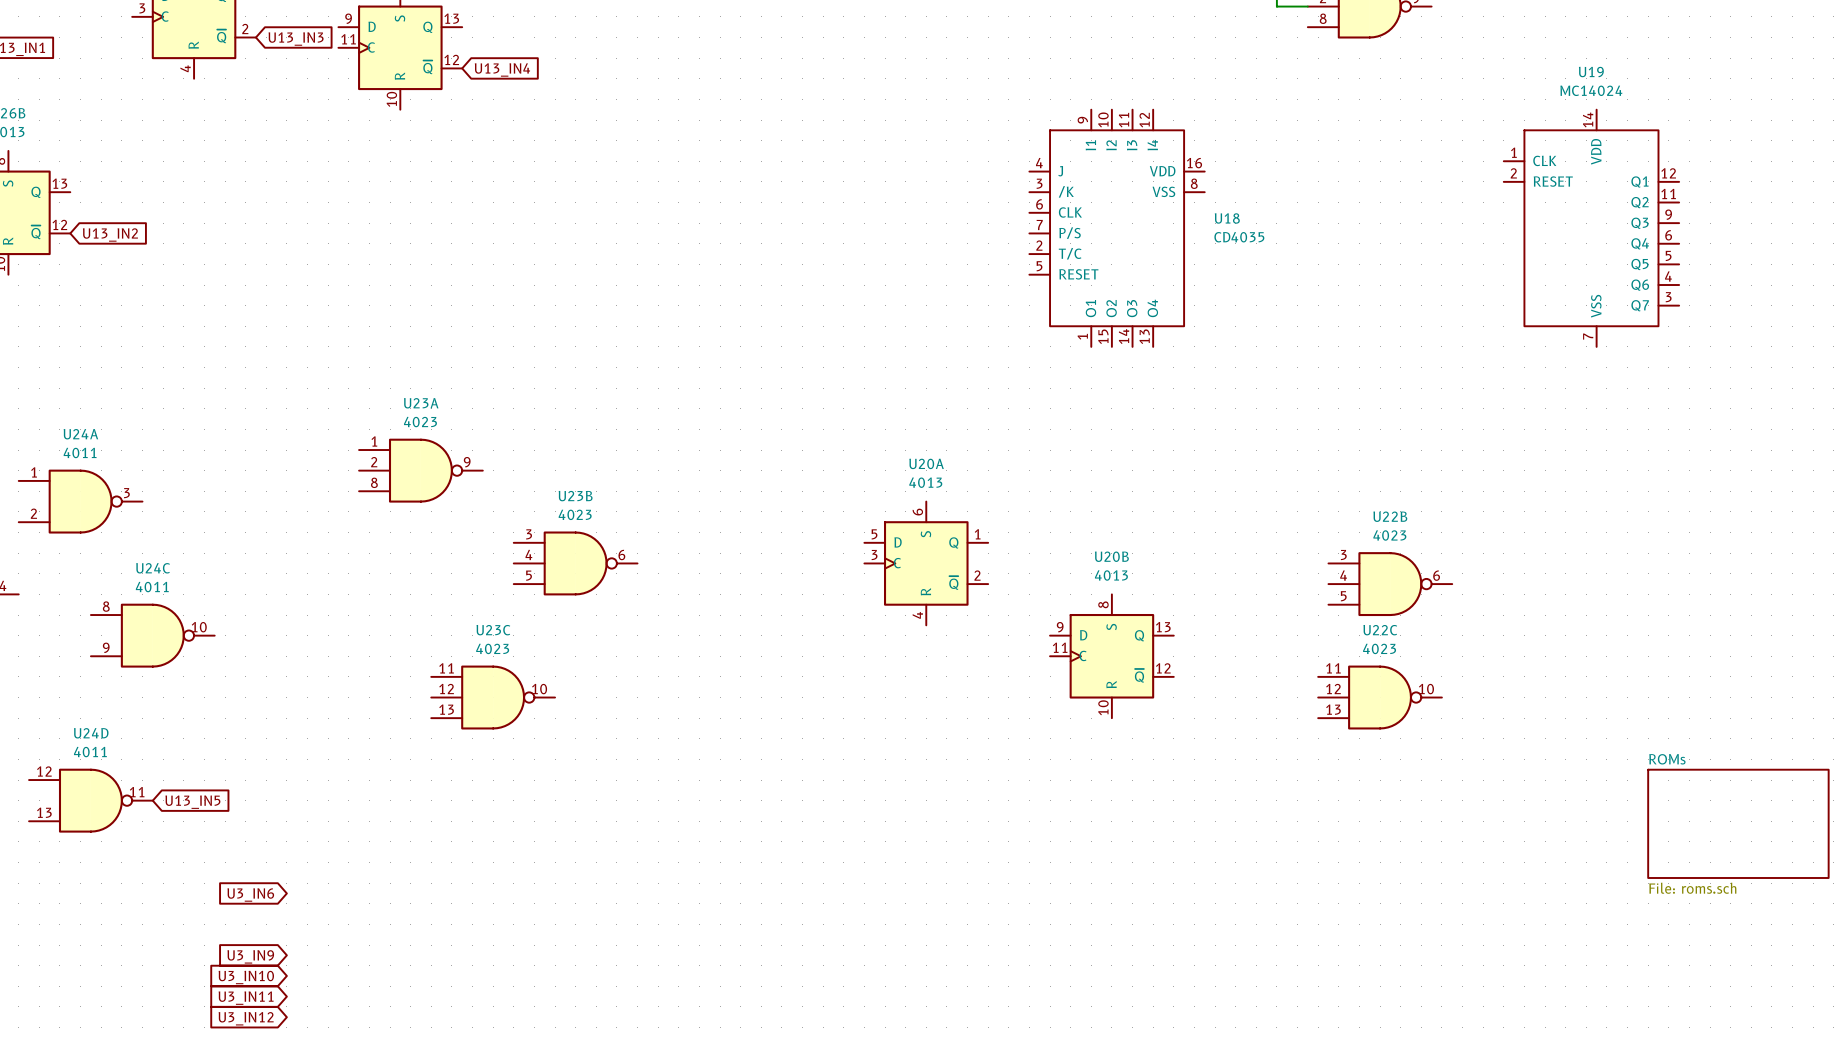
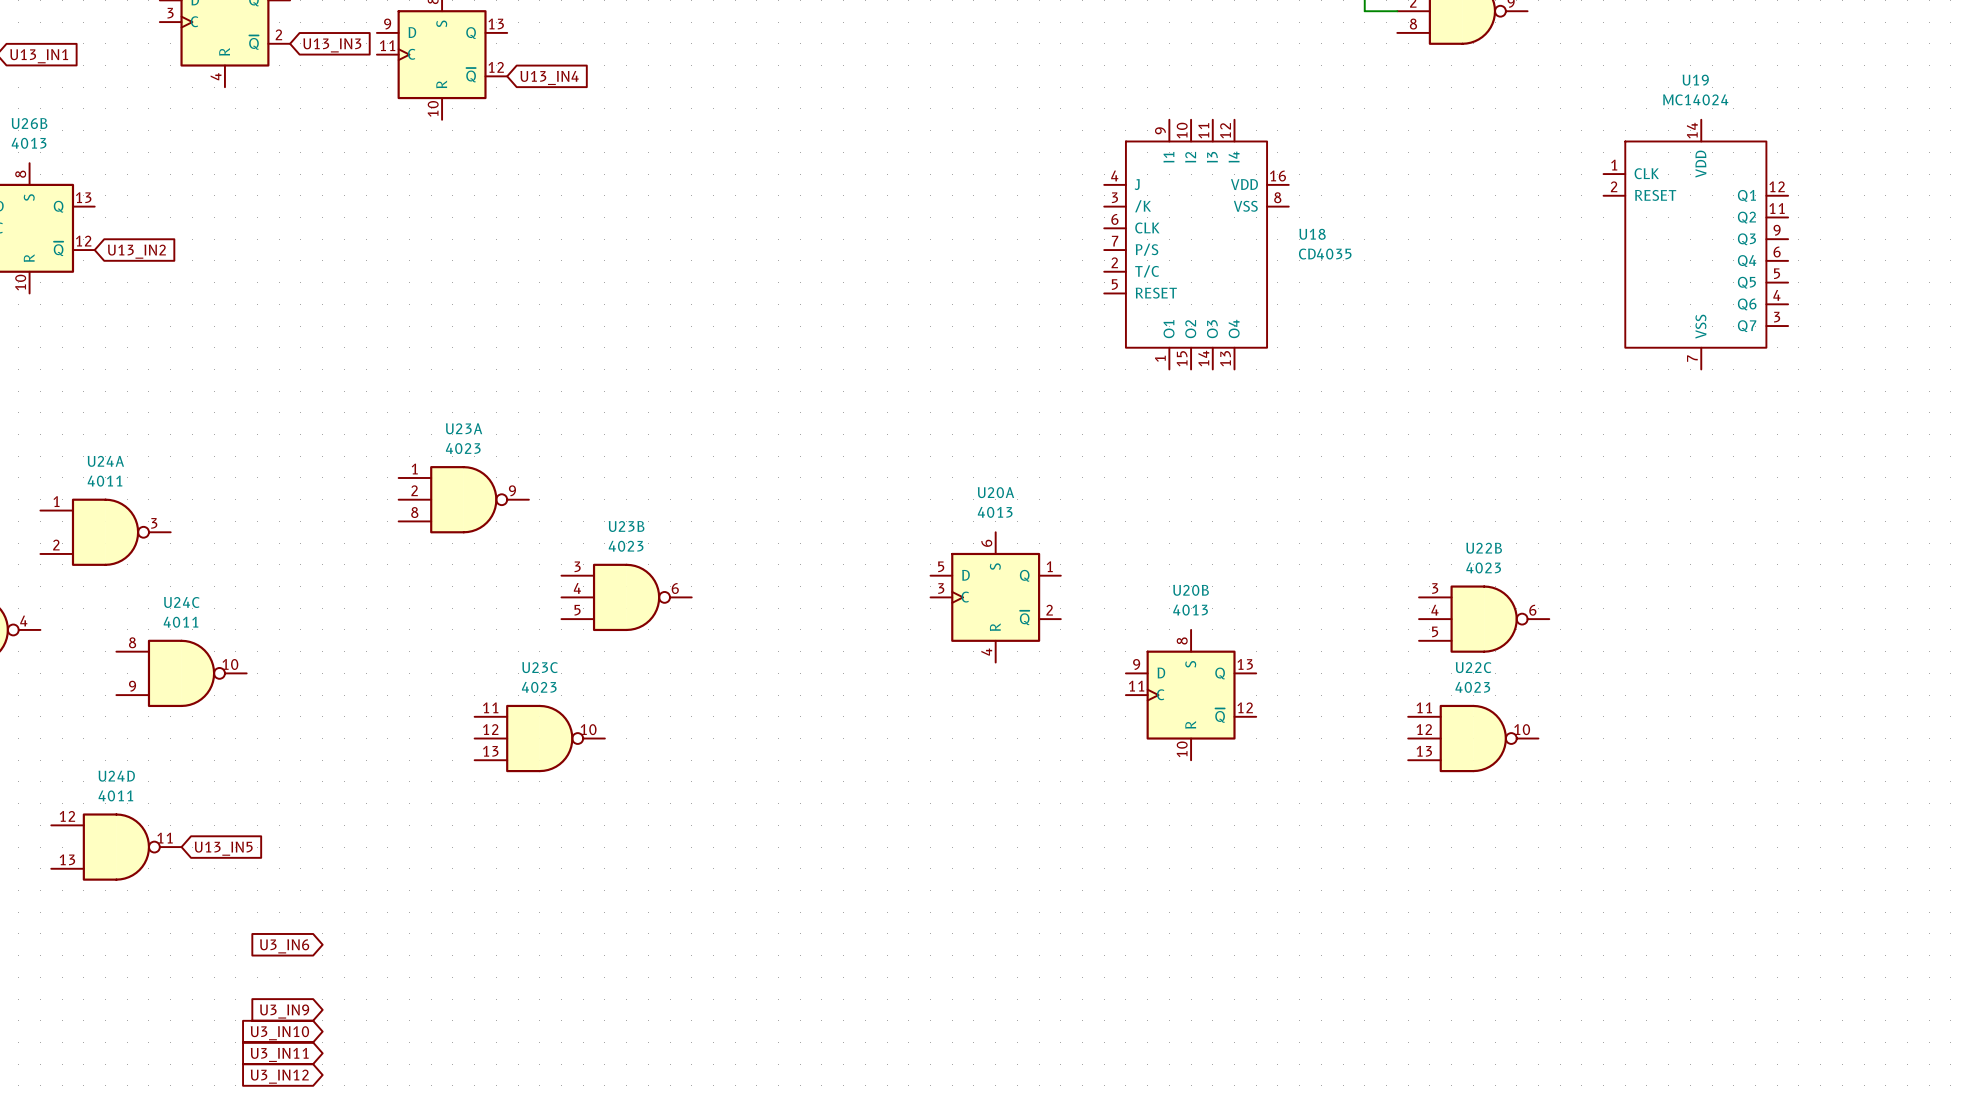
sheet ROMs: File: roms.sch (1738, 823) -> none

